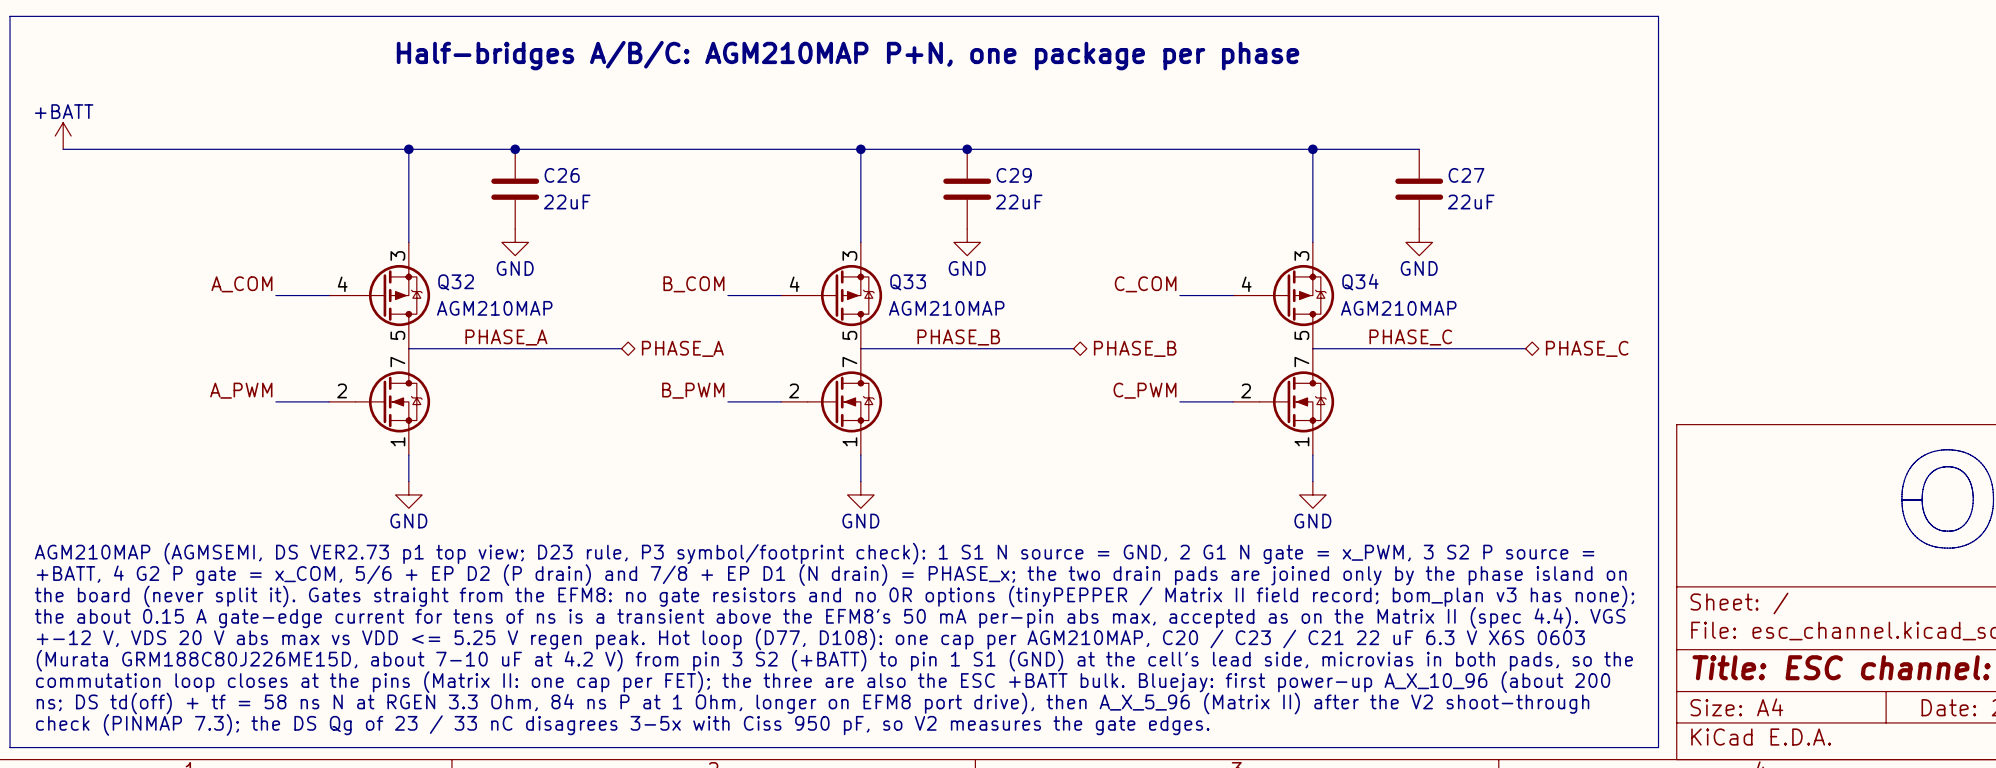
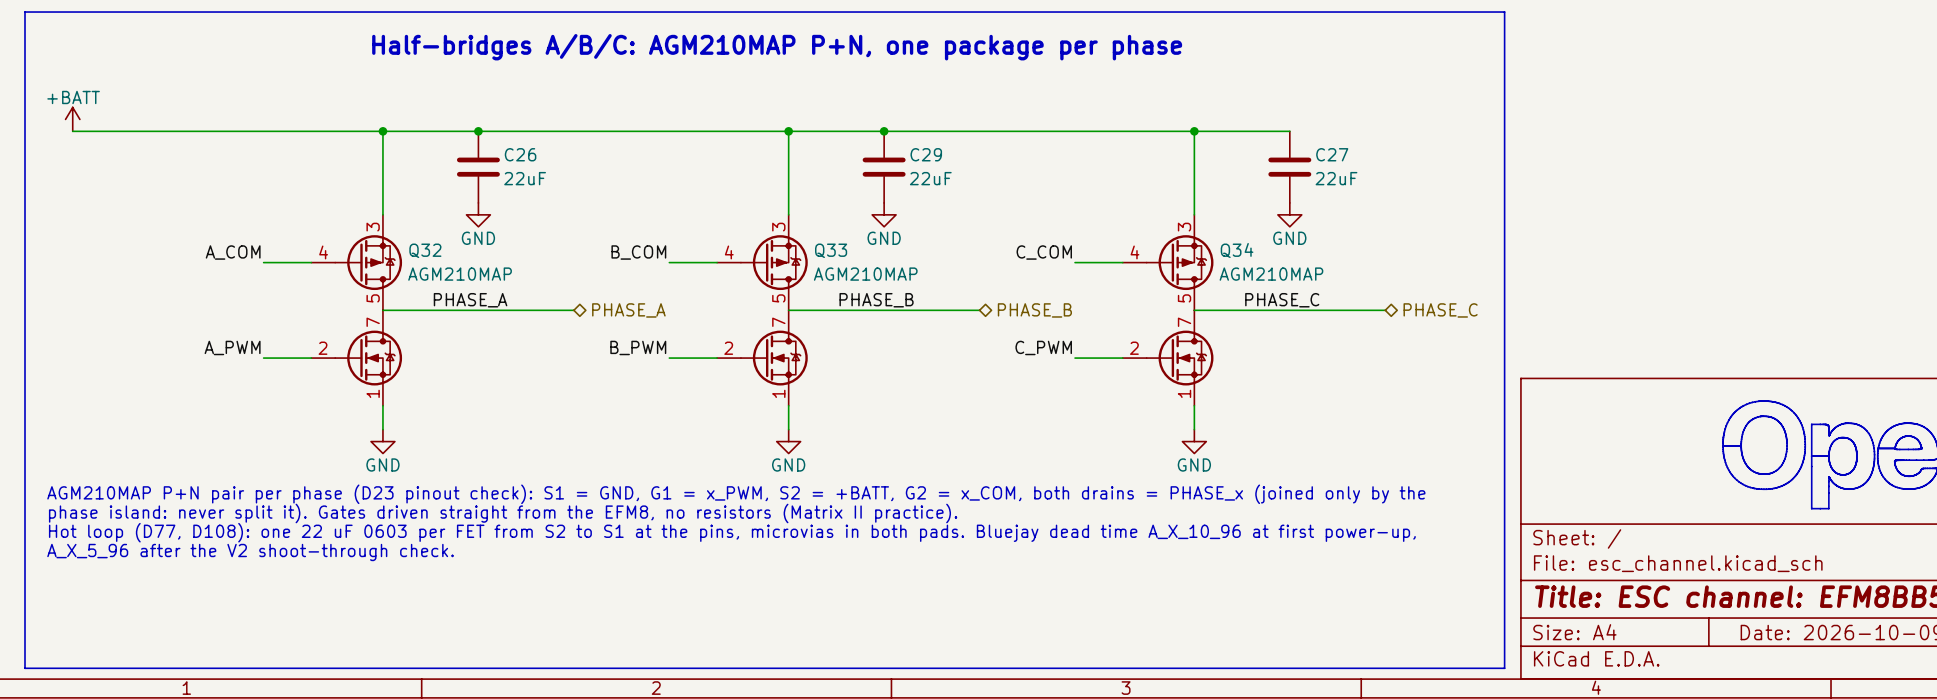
text: AGM210MAP (AGMSEMI, DS VER2.73 p1 top view; D23 rule, P3 symbol/footprint check): 1 S1 N source = GND, 2 G1 N gate = x_PWM, 3 S2 P source = (814, 553) -> AGM210MAP P+N pair per phase (D23 pinout check): S1 = GND, G1 = x_PWM, S2 = +BATT, G2 = x_COM, both drains = PHASE_x (joined only by the (736, 494)
text: +BATT, 4 G2 P gate = x_COM, 5/6 + EP D2 (P drain) and 7/8 + EP D1 (N drain) = PHASE_x; the two drain pads are joined only by the phase island on (831, 575) -> phase island: never split it). Gates driven straight from the EFM8, no resistors (Matrix II practice). (503, 513)
text: the board (never split it). Gates straight from the EFM8: no gate resistors and no 0R options (tinyPEPPER / Matrix II field record; bom_plan v3 has none); (834, 596) -> Hot loop (D77, D108): one 22 uF 0603 per FET from S2 to S1 at the pins, microvias in both pads. Bluejay dead time A_X_10_96 at first power-up, (732, 532)
text: the about 0.15 A gate-edge current for tens of ns is a transient above the EFM8's 50 mA per-pin abs max, accepted as on the Matrix II (spec 4.4). VGS (830, 617) -> A_X_5_96 after the V2 shoot-through check. (250, 552)
text: +-12 V, VDS 20 V abs max vs VDD <= 5.25 V regen peak. Hot loop (D77, D108): one cap per AGM210MAP, C20 / C23 / C21 22 uF 6.3 V X6S 0603 (810, 639) -> none
text: (Murata GRM188C80J226ME15D, about 7-10 uF at 4.2 V) from pin 3 S2 (+BATT) to pin 1 S1 (GND) at the cell's lead side, microvias in both pads, so the (834, 660) -> none
text: commutation loop closes at the pins (Matrix II: one cap per FET); the three are also the ESC +BATT bulk. Bluejay: first power-up A_X_10_96 (about 200 (823, 682) -> none
text: ns; DS td(off) + tf = 58 ns N at RGEN 3.3 Ohm, 84 ns P at 1 Ohm, longer on EFM8 port drive), then A_X_5_96 (Matrix II) after the V2 shoot-through (813, 703) -> none
text: check (PINMAP 7.3); the DS Qg of 23 / 33 nC disagrees 3-5x with Ciss 950 pF, so V2 measures the gate edges. (622, 724) -> none

